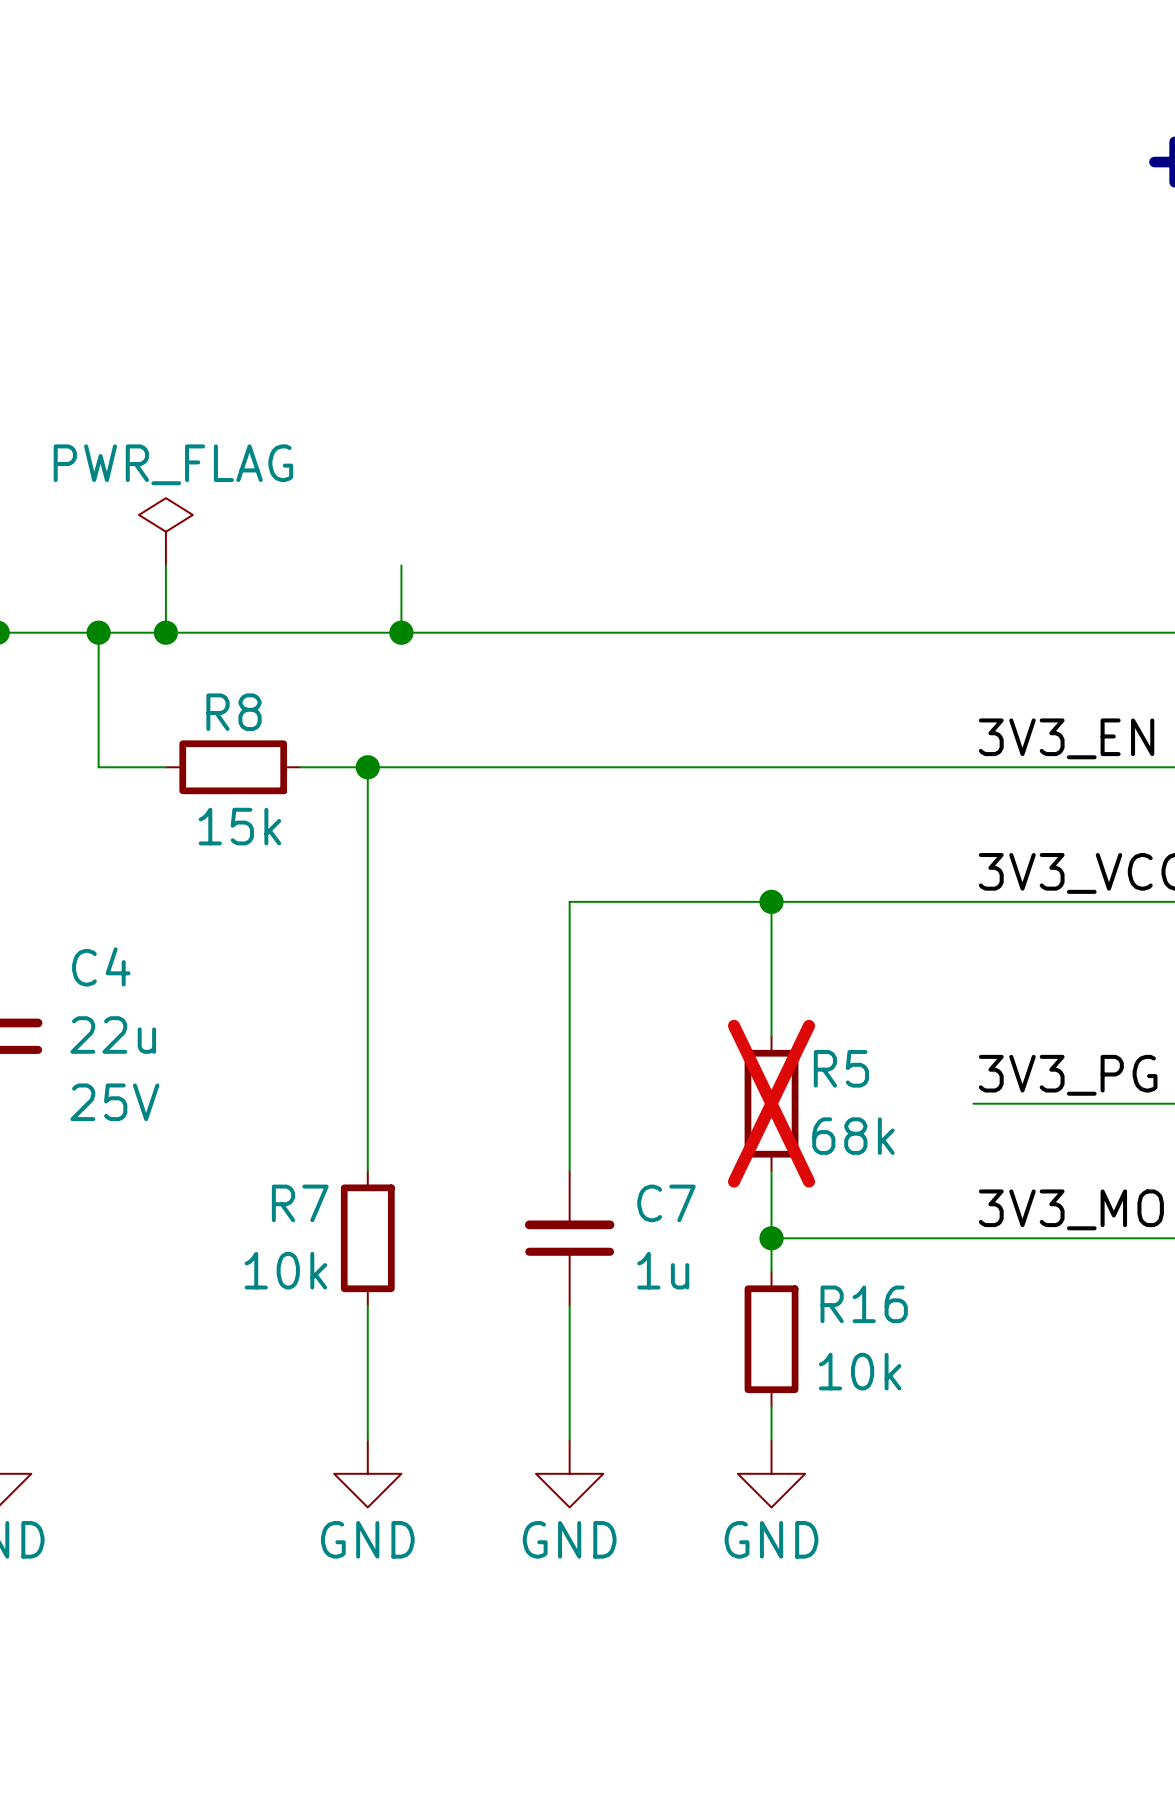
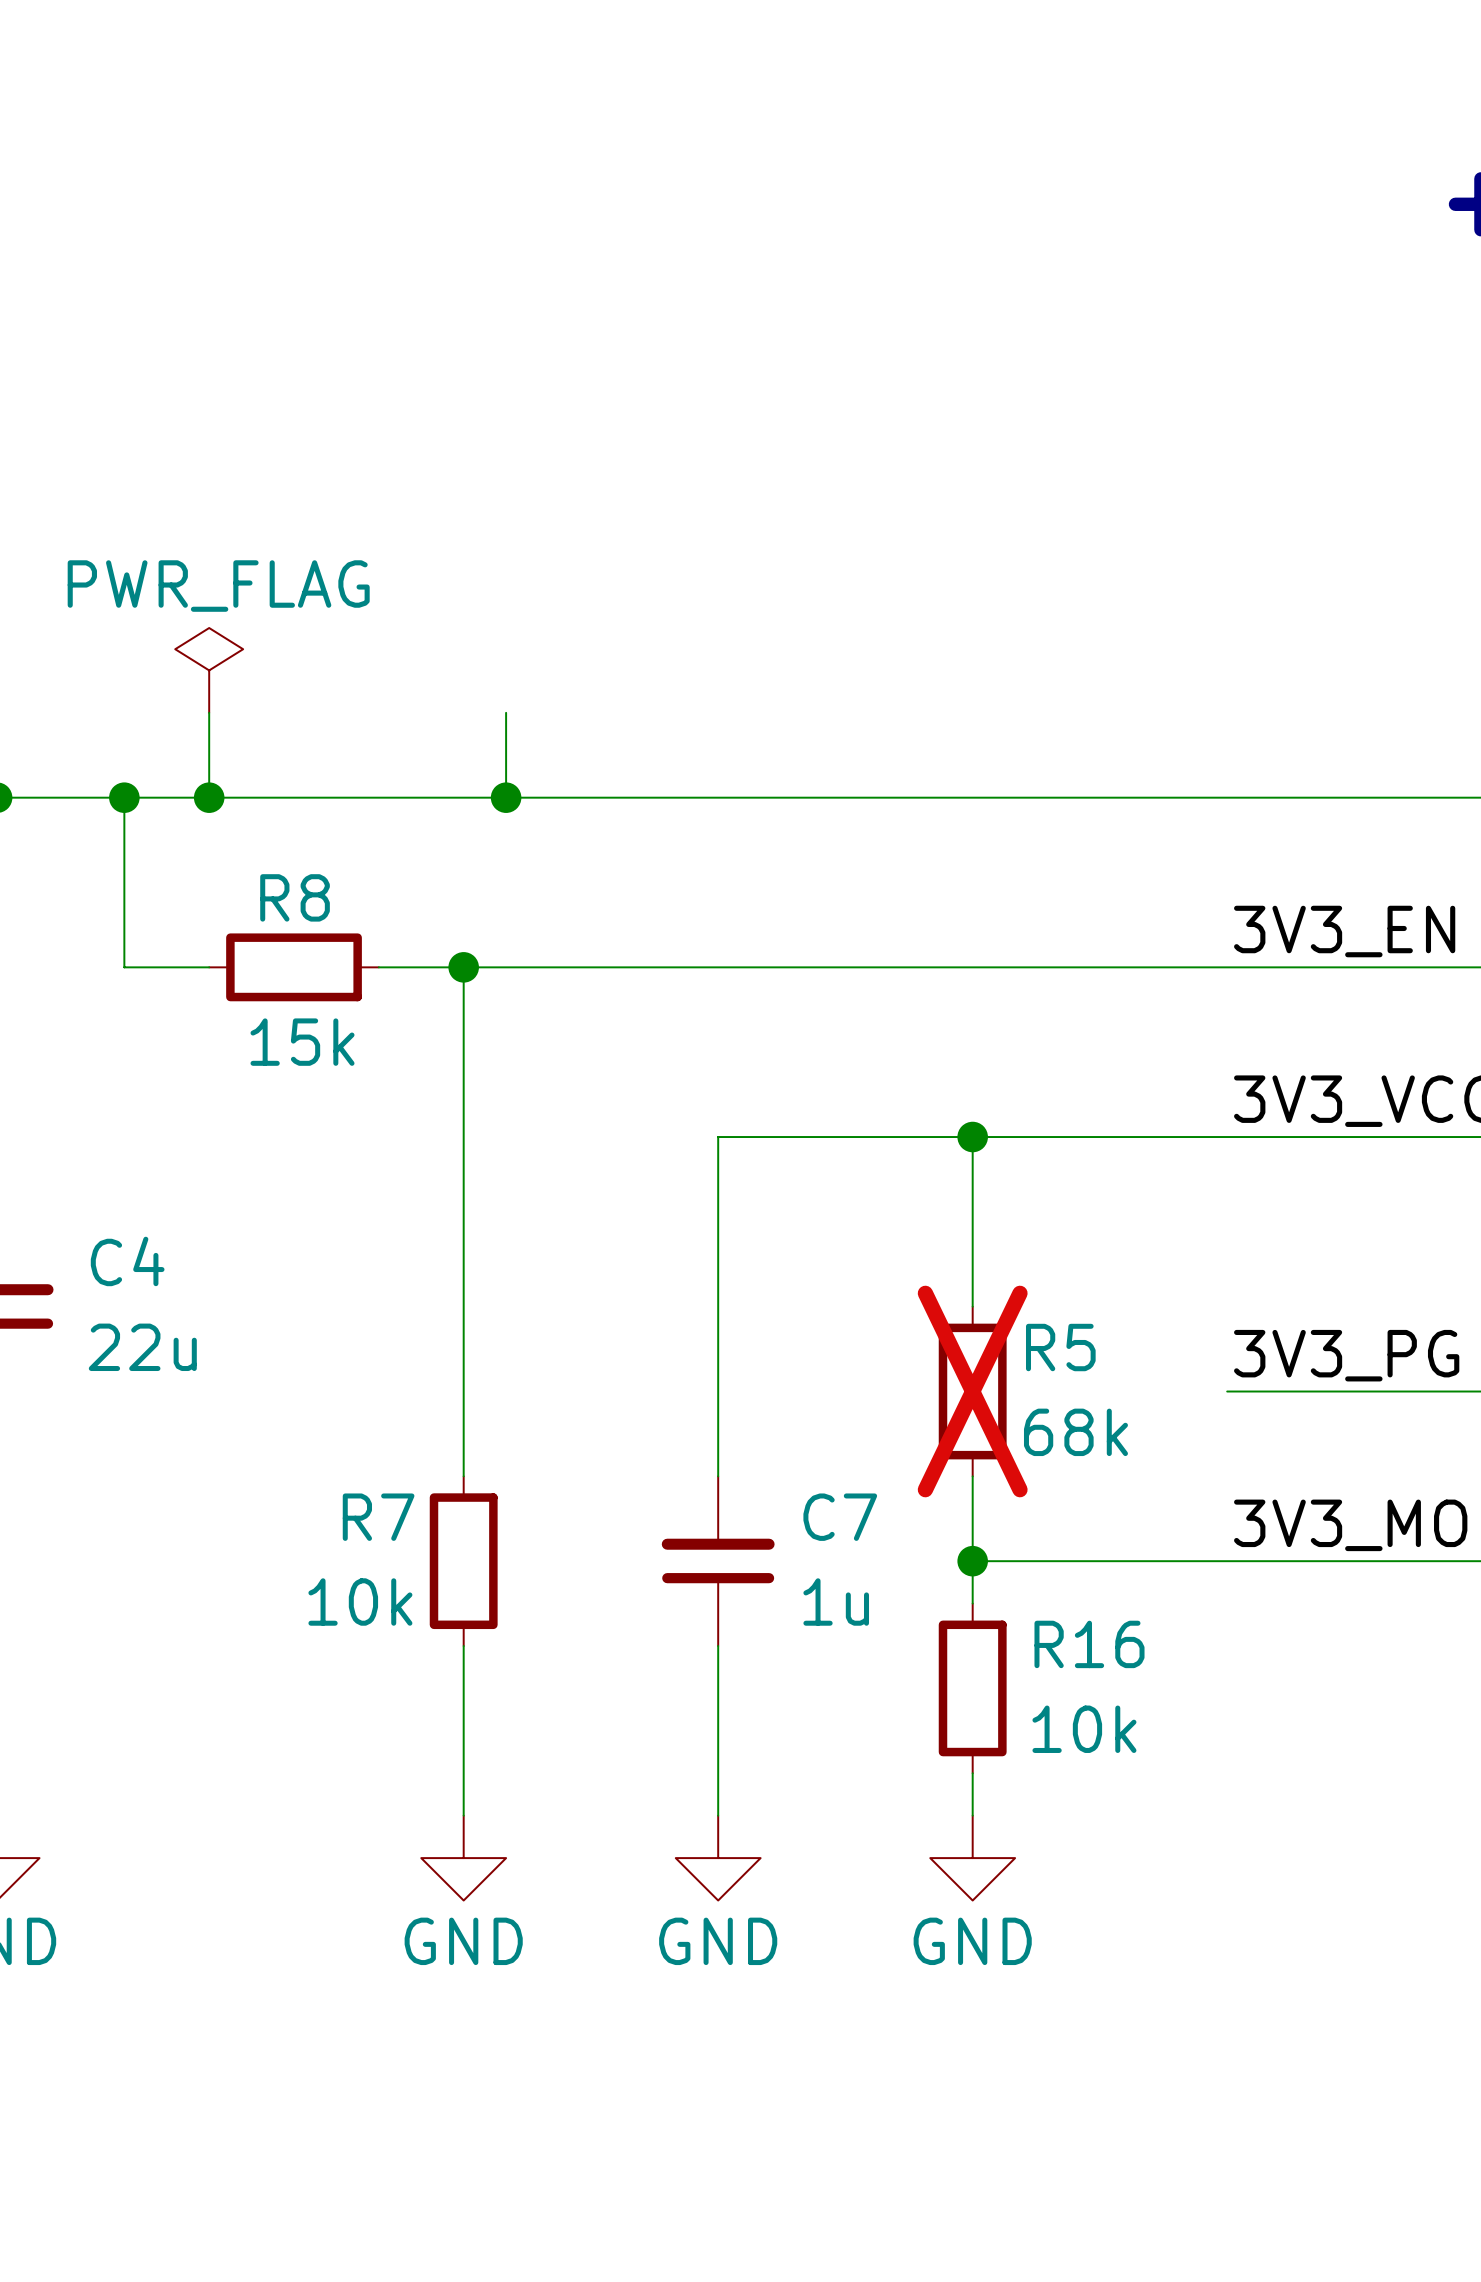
C4 name position: C4 (101, 966) -> C4 (127, 1261)
C4 text position: 22u (113, 1035) -> 22u (142, 1347)
C4 text: 25V (114, 1102) -> none

